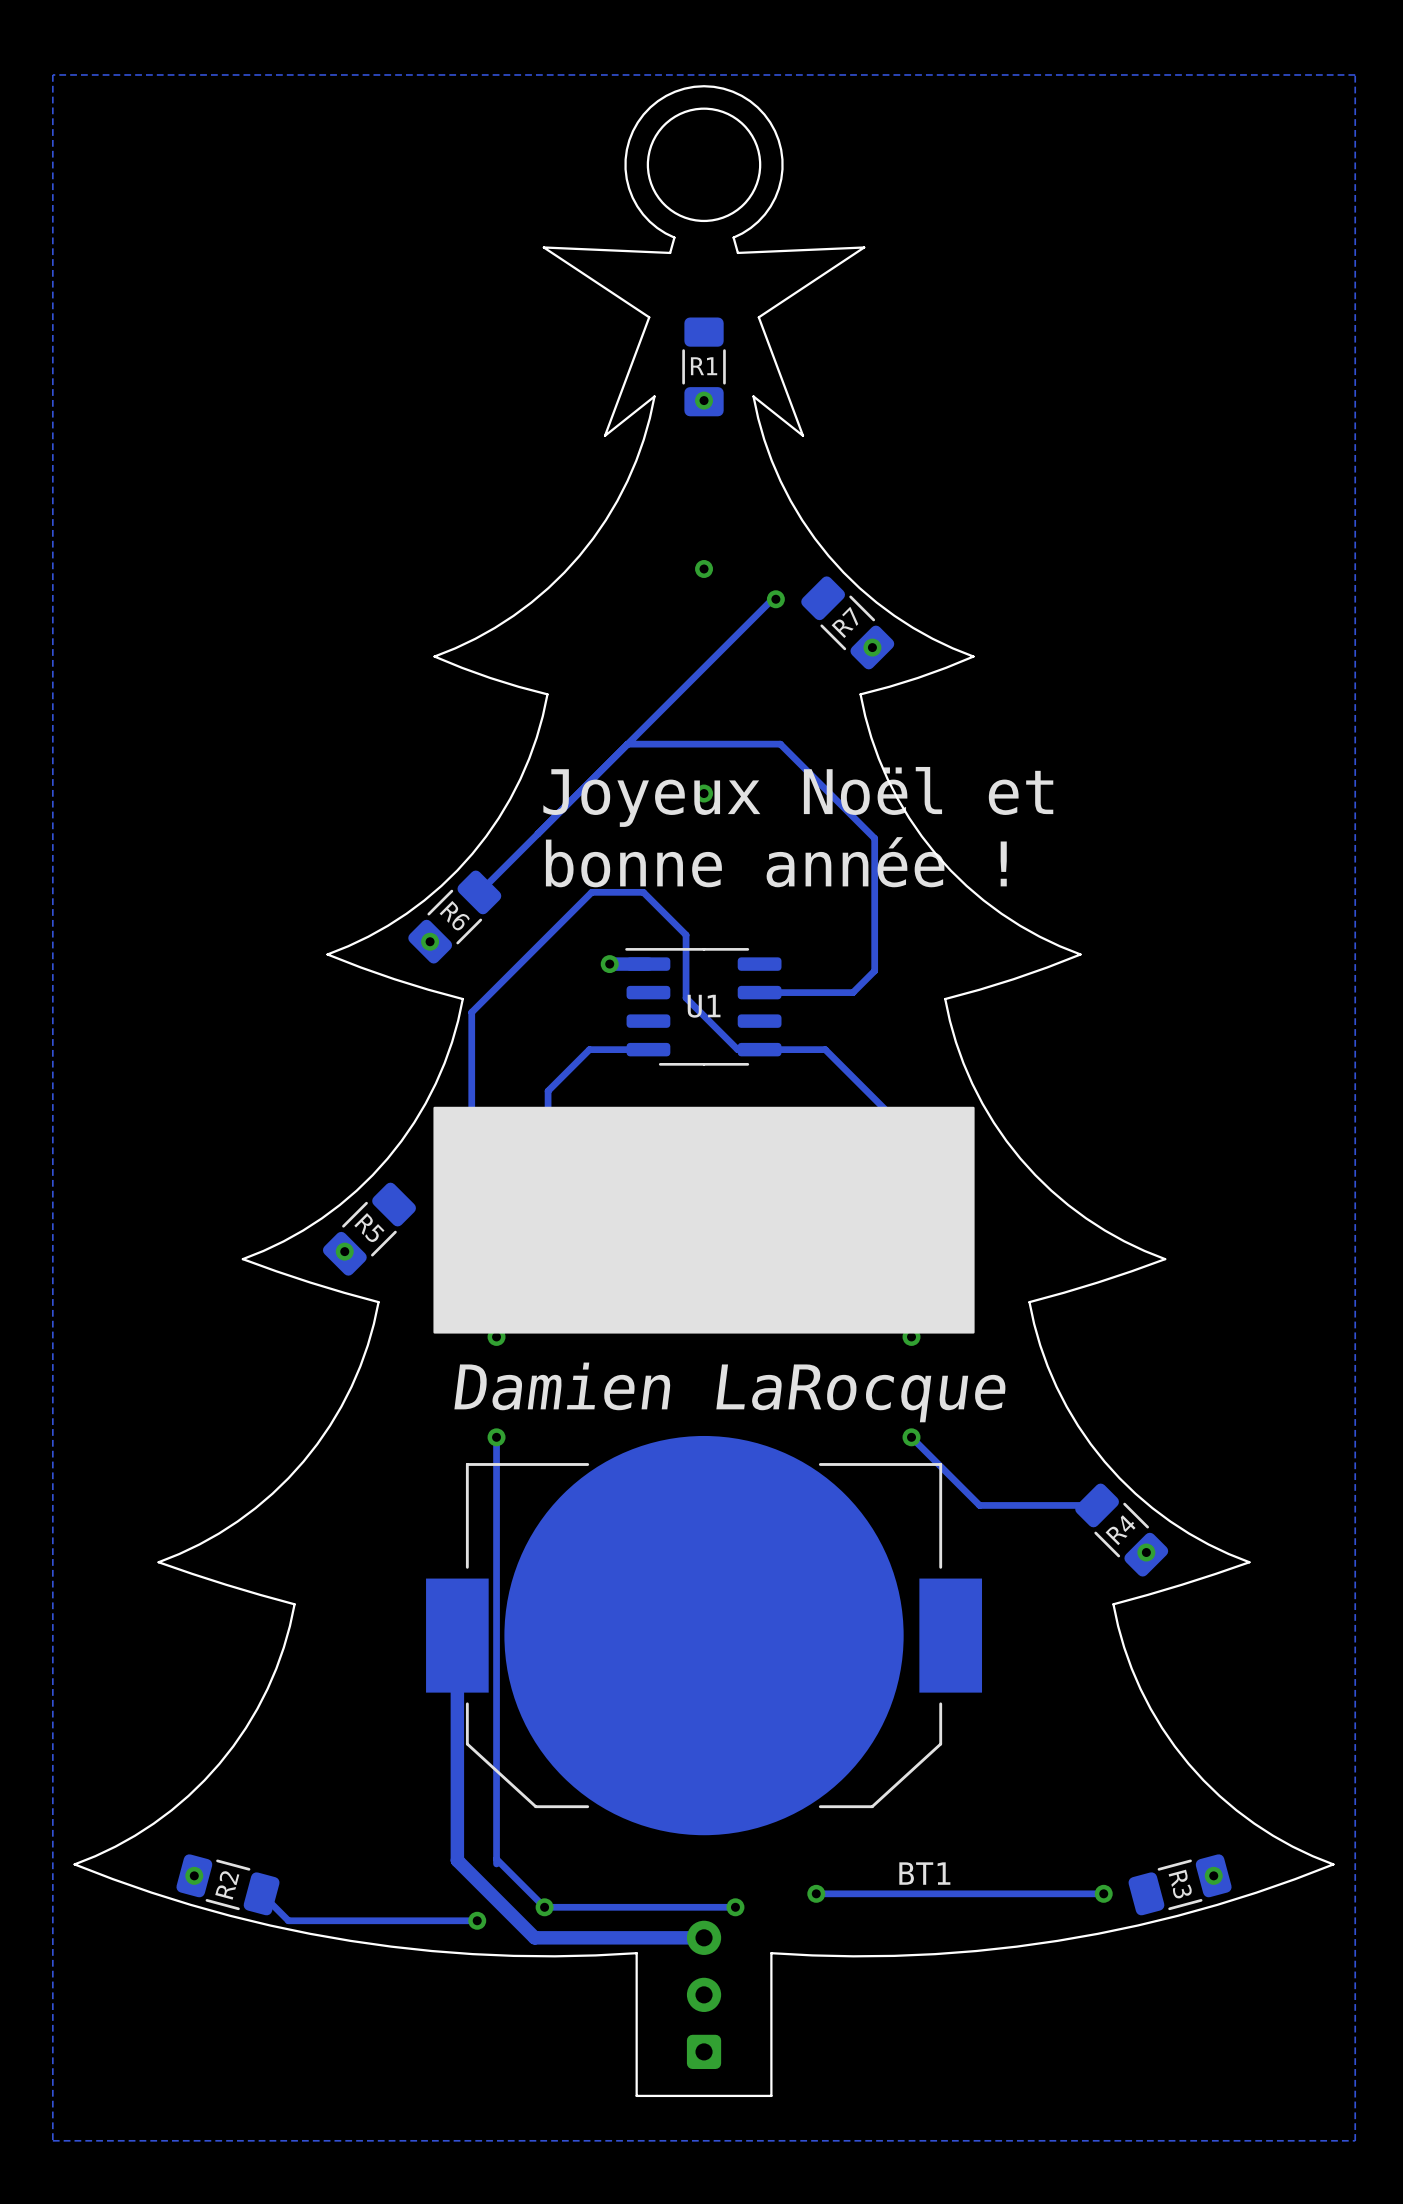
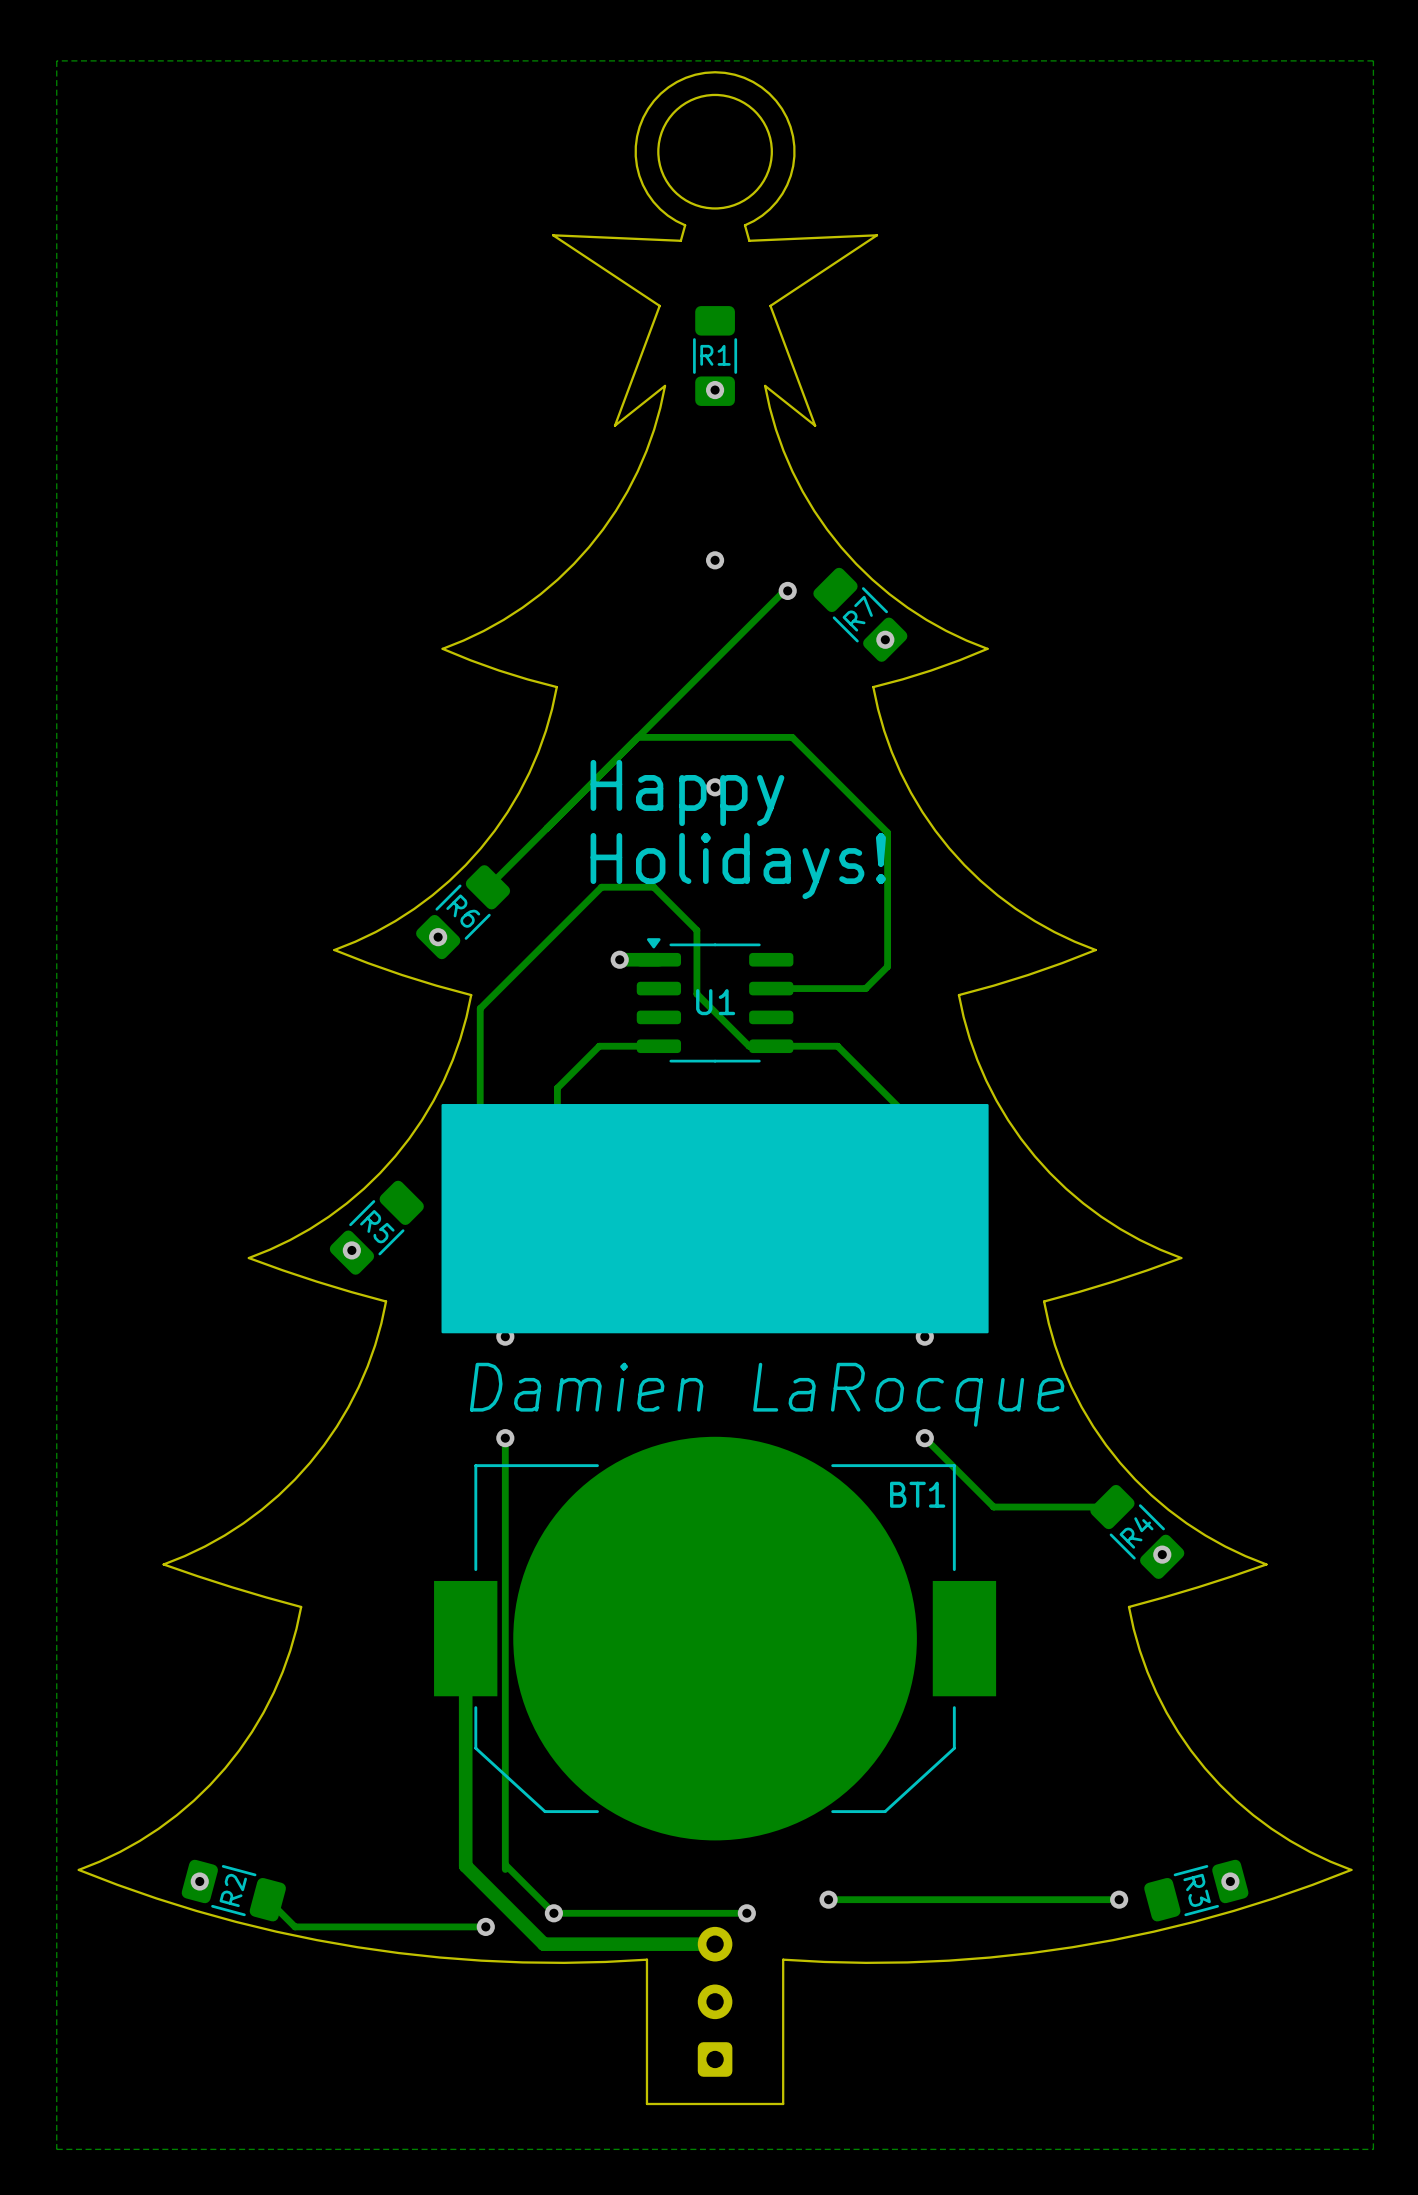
text: Joyeux Noël et (798, 796) -> none
text: none -> Happy (687, 792)
text: bonne année ! (776, 862) -> none
text: none -> Holidays! (738, 866)
U1 footprint: [625, 948, 782, 1066] -> [636, 938, 794, 1063]
BT1 name position: BT1 (924, 1873) -> BT1 (917, 1494)

